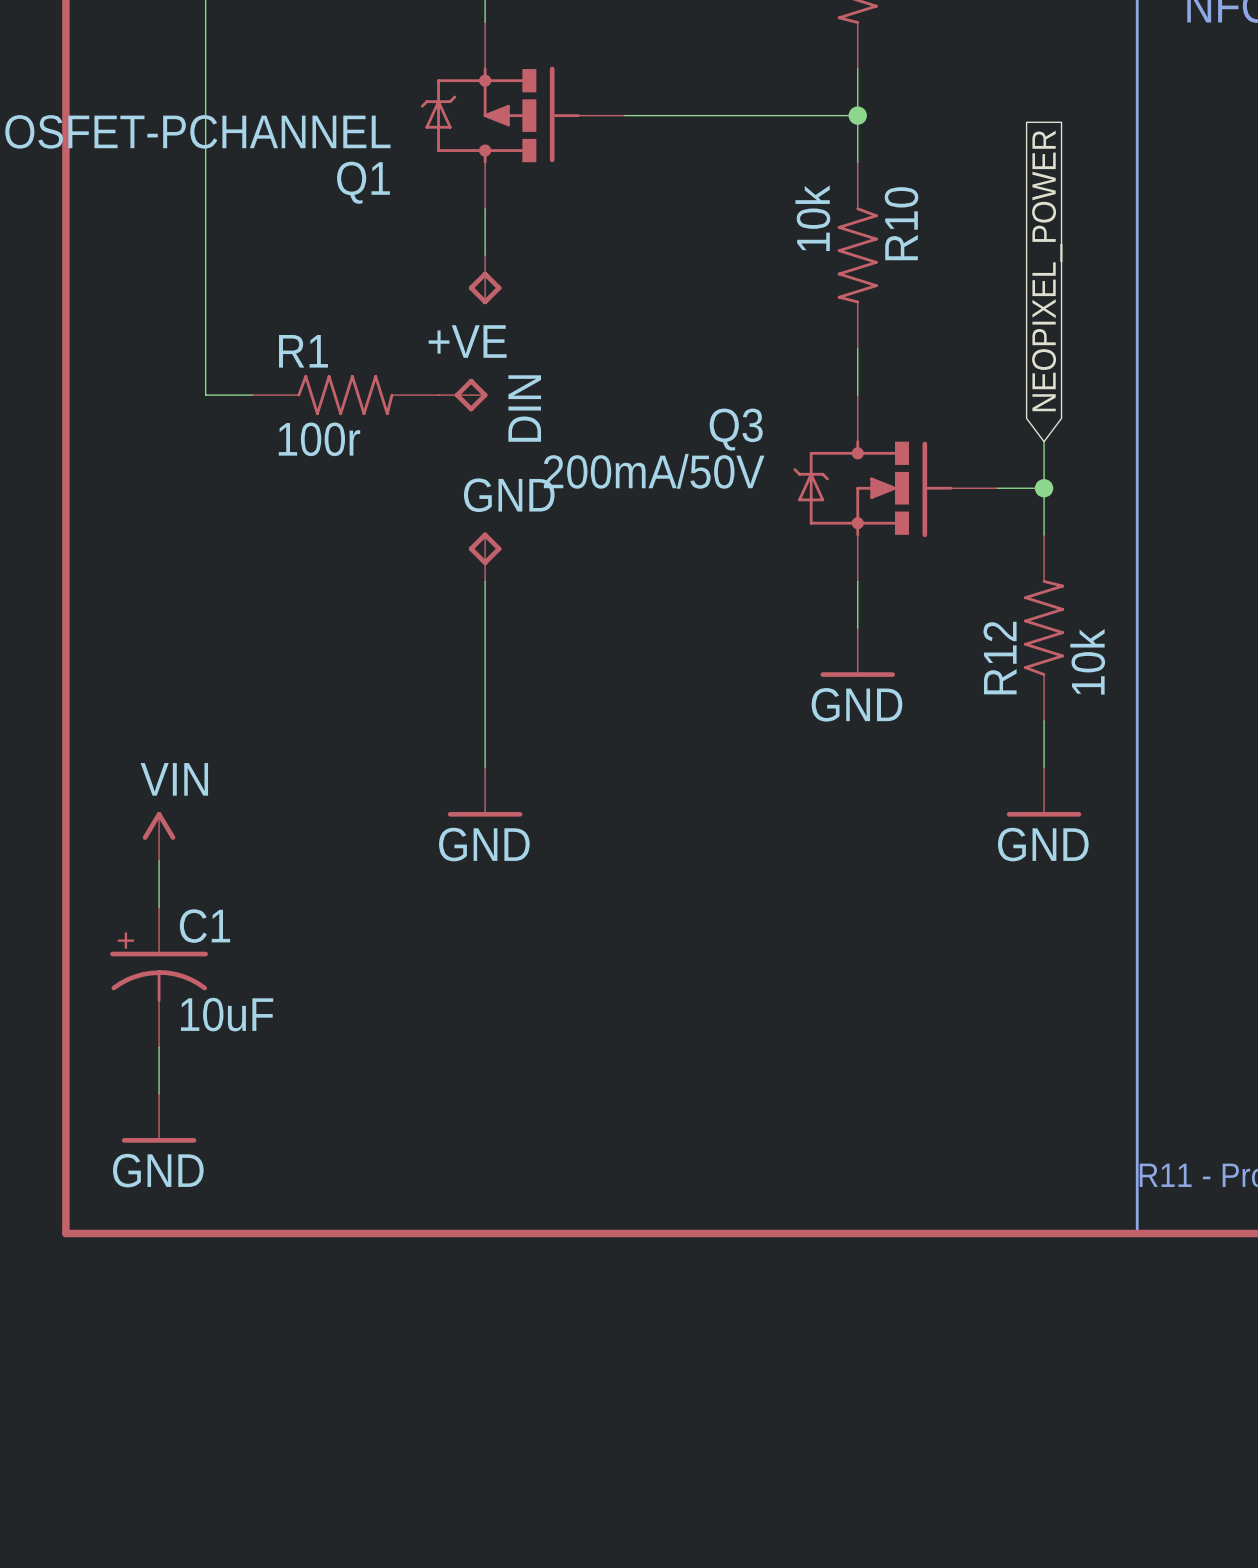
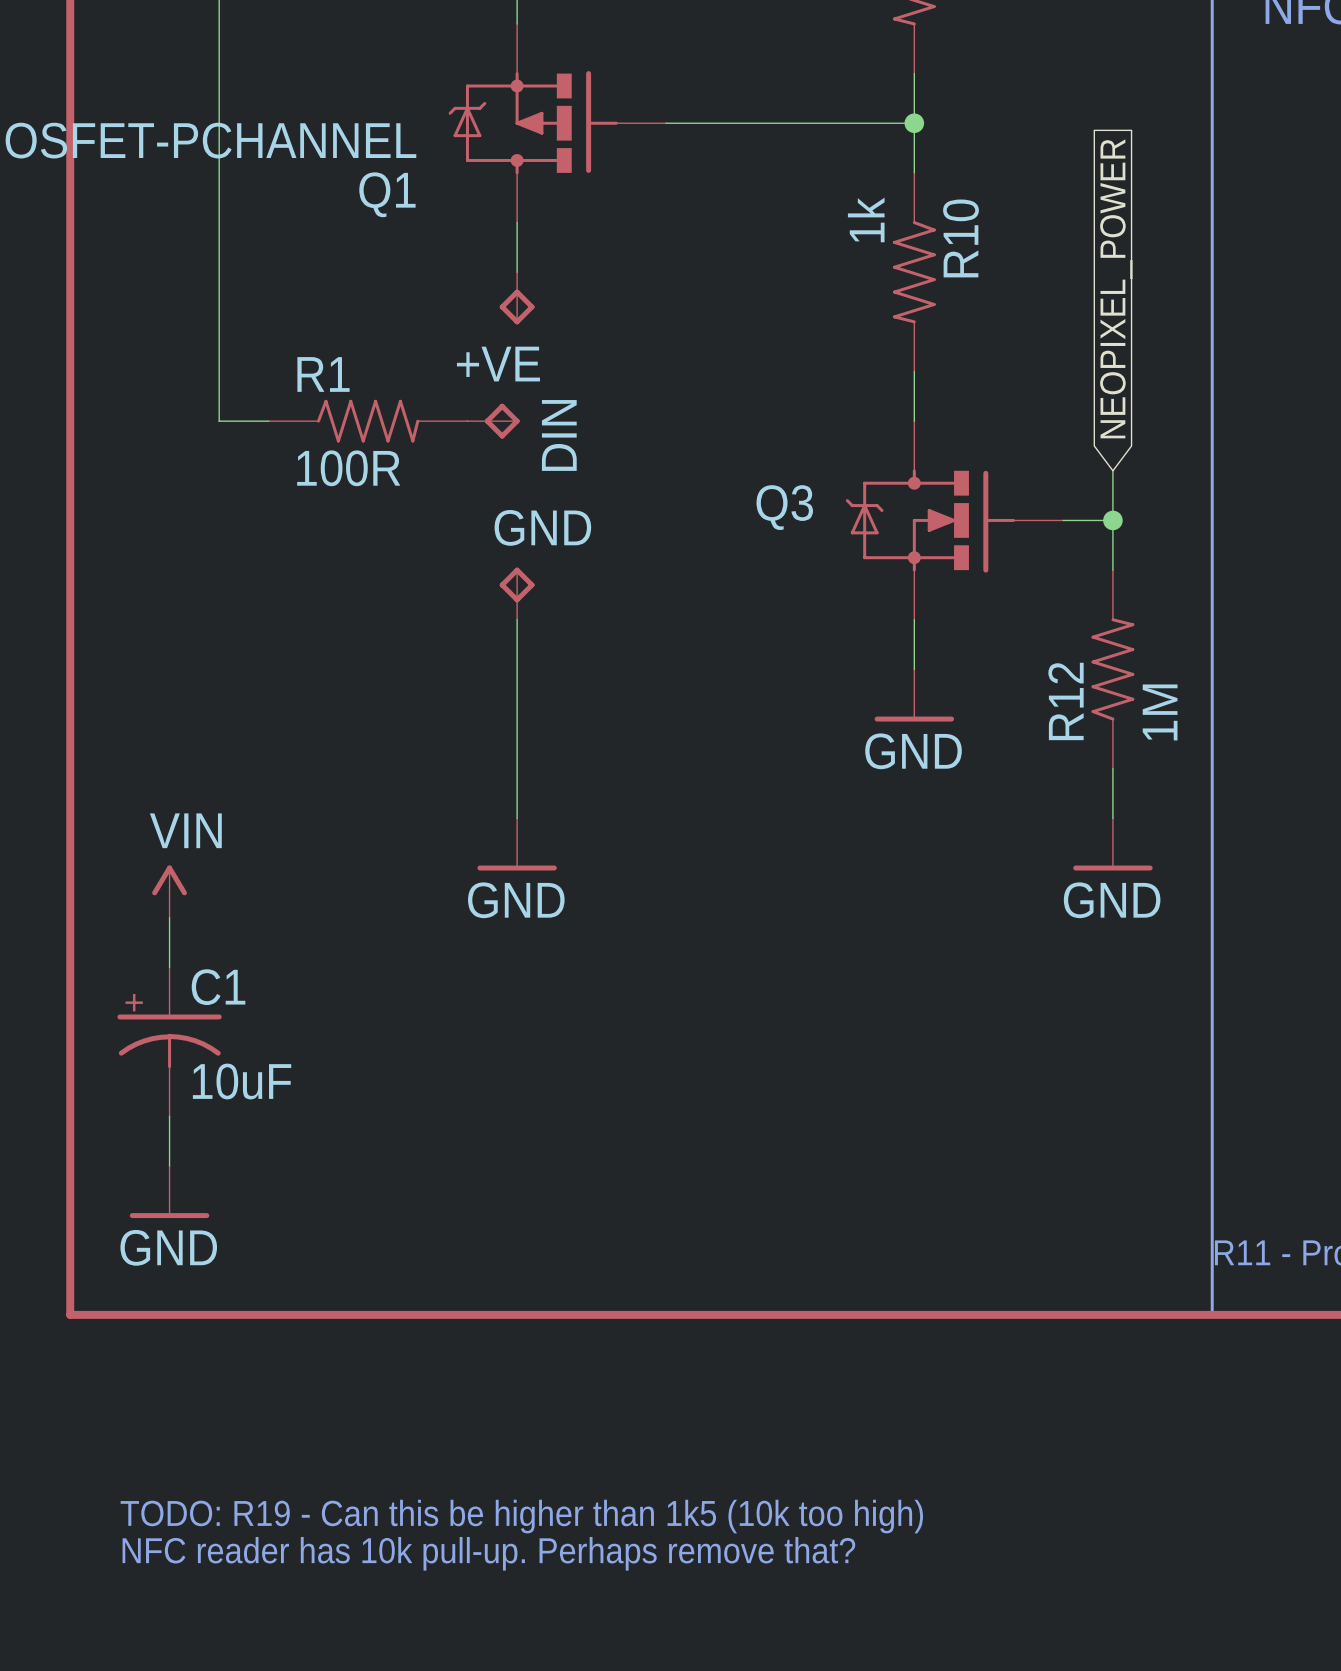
R10 value: 10k (812, 218) -> 1k (866, 219)
Q3 name position: Q3 (736, 429) -> Q3 (784, 507)
R1 value: 100r (319, 439) -> 100R (348, 468)
Q3 value: 200mA/50V (654, 471) -> none
R12 value: 10k (1087, 661) -> 1M (1160, 712)
text: none -> TODO: R19 - Can this be higher than 1k5 (10k too high) (521, 1516)
text: none -> NFC reader has 10k pull-up. Perhaps remove that? (488, 1553)

